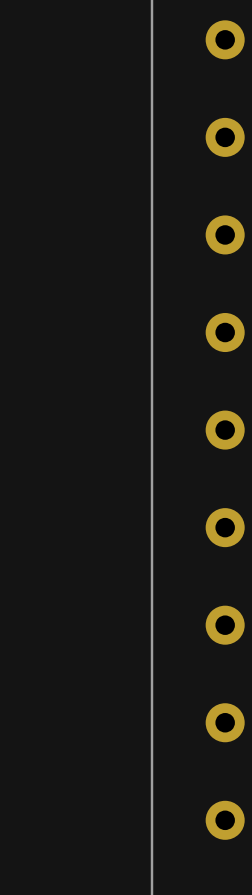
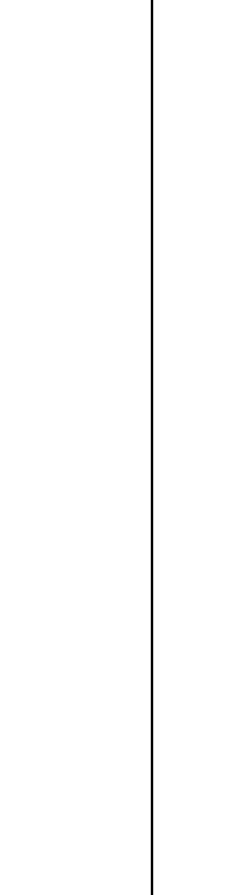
via: (225, 39) -> none
via: (225, 137) -> none
via: (225, 234) -> none
via: (225, 332) -> none
via: (225, 430) -> none
via: (225, 527) -> none
via: (225, 625) -> none
via: (225, 722) -> none
via: (225, 820) -> none

